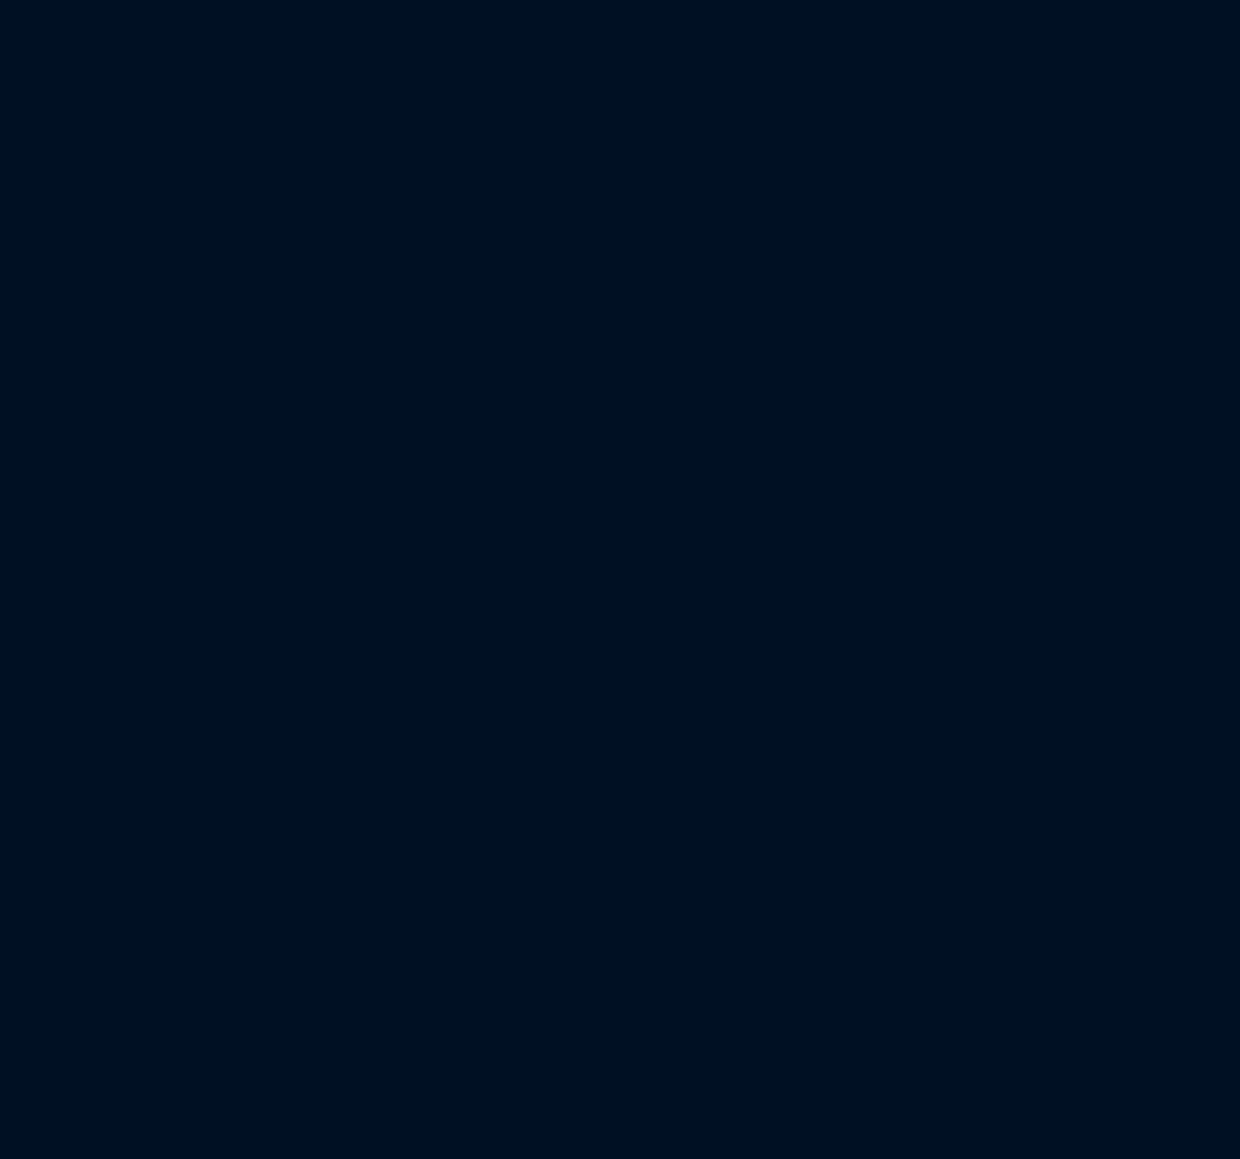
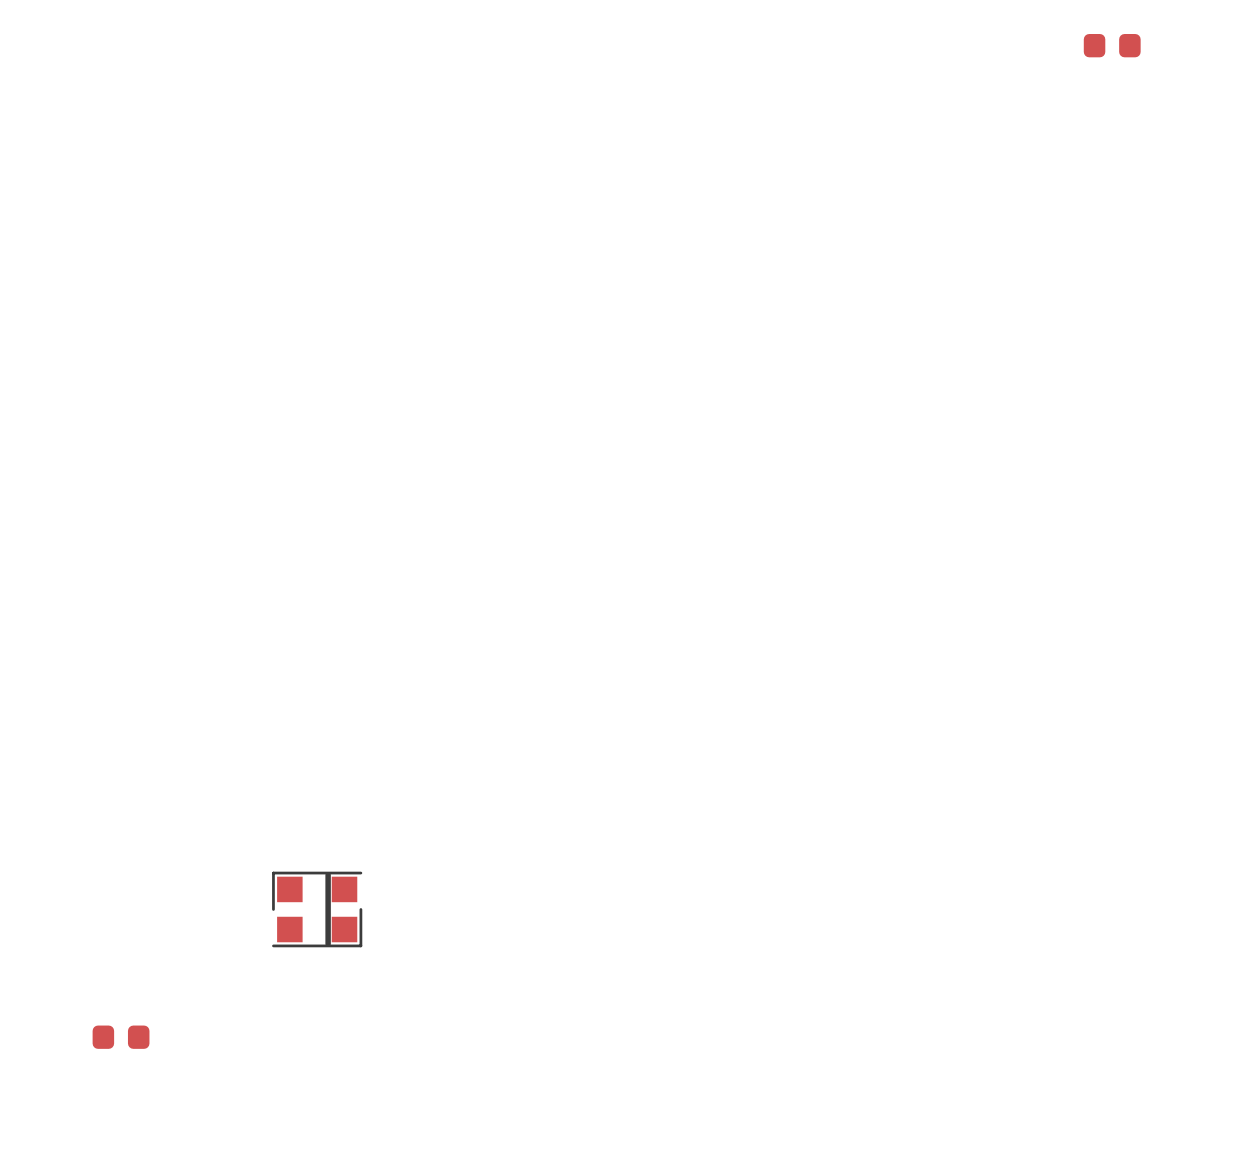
part: none -> (1112, 45)
part: none -> (317, 909)
part: none -> (121, 1037)

